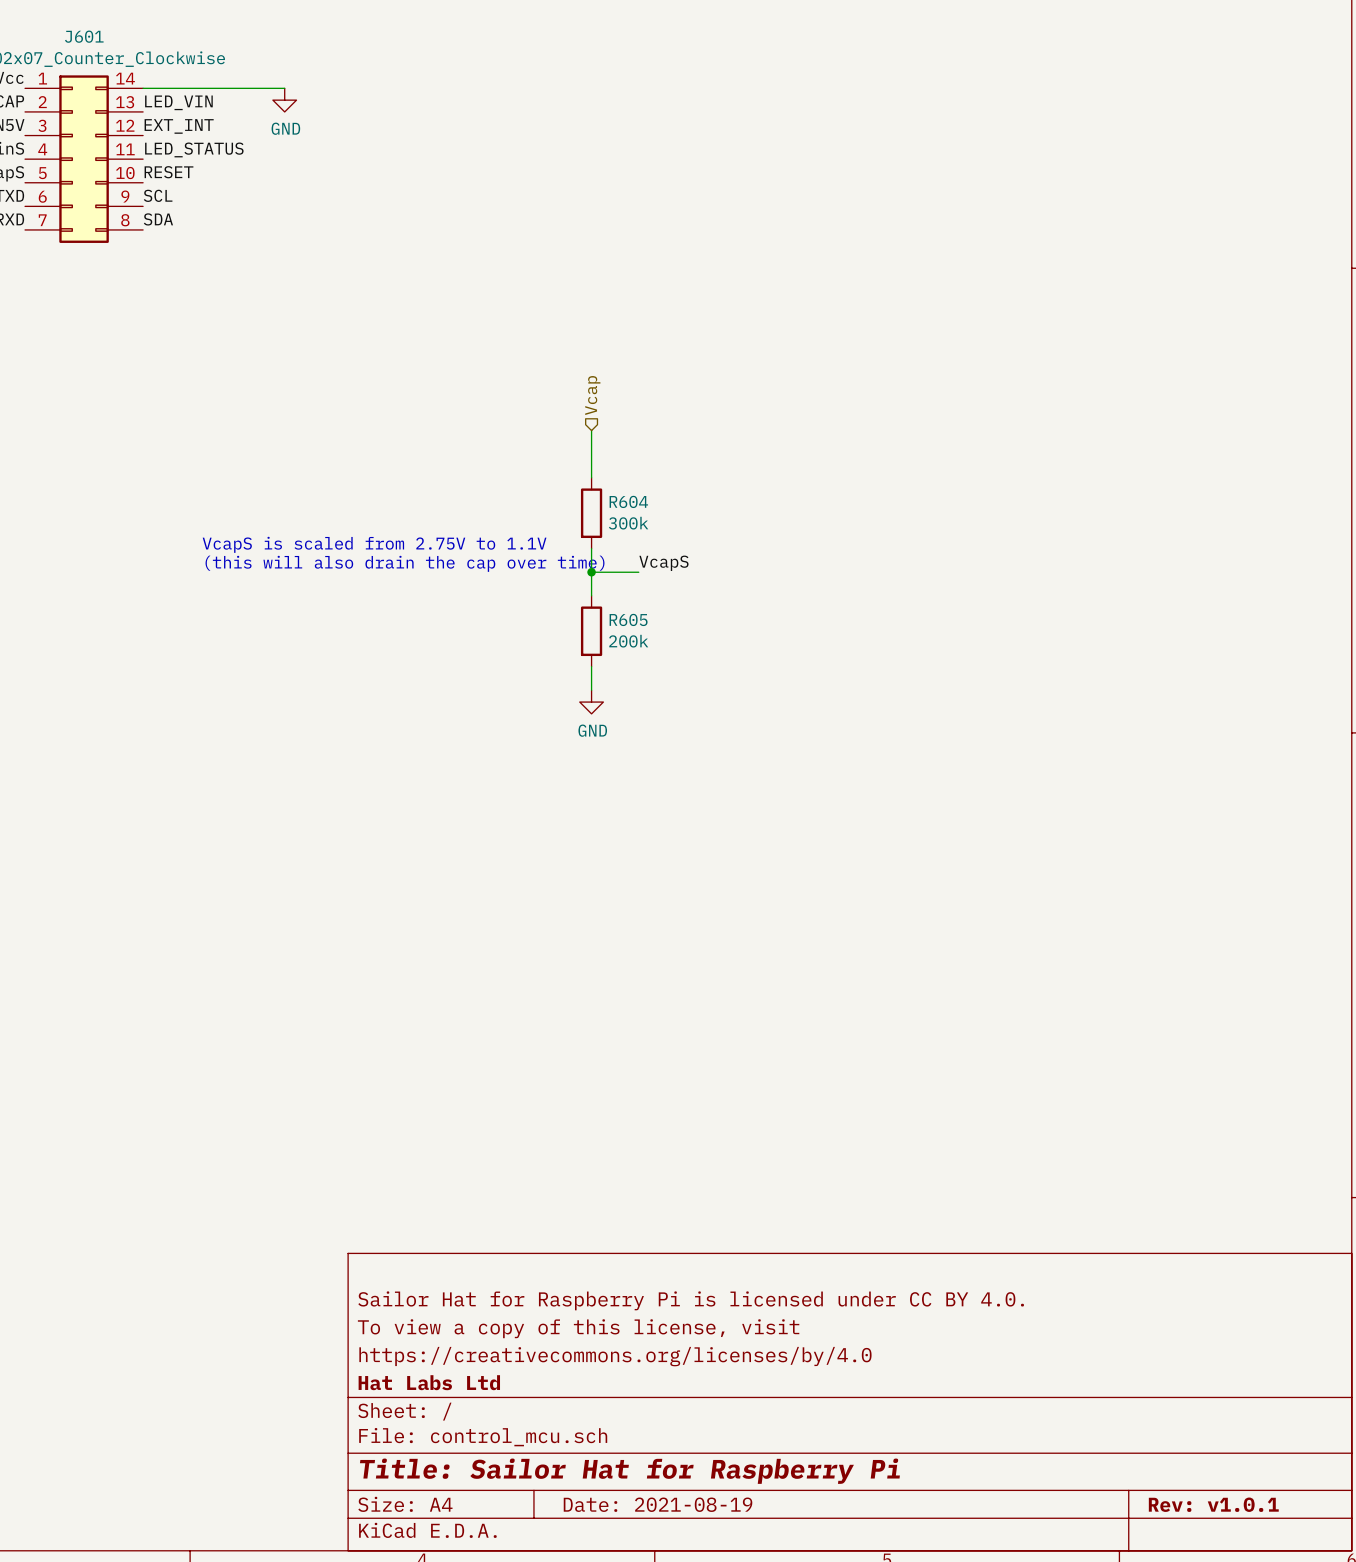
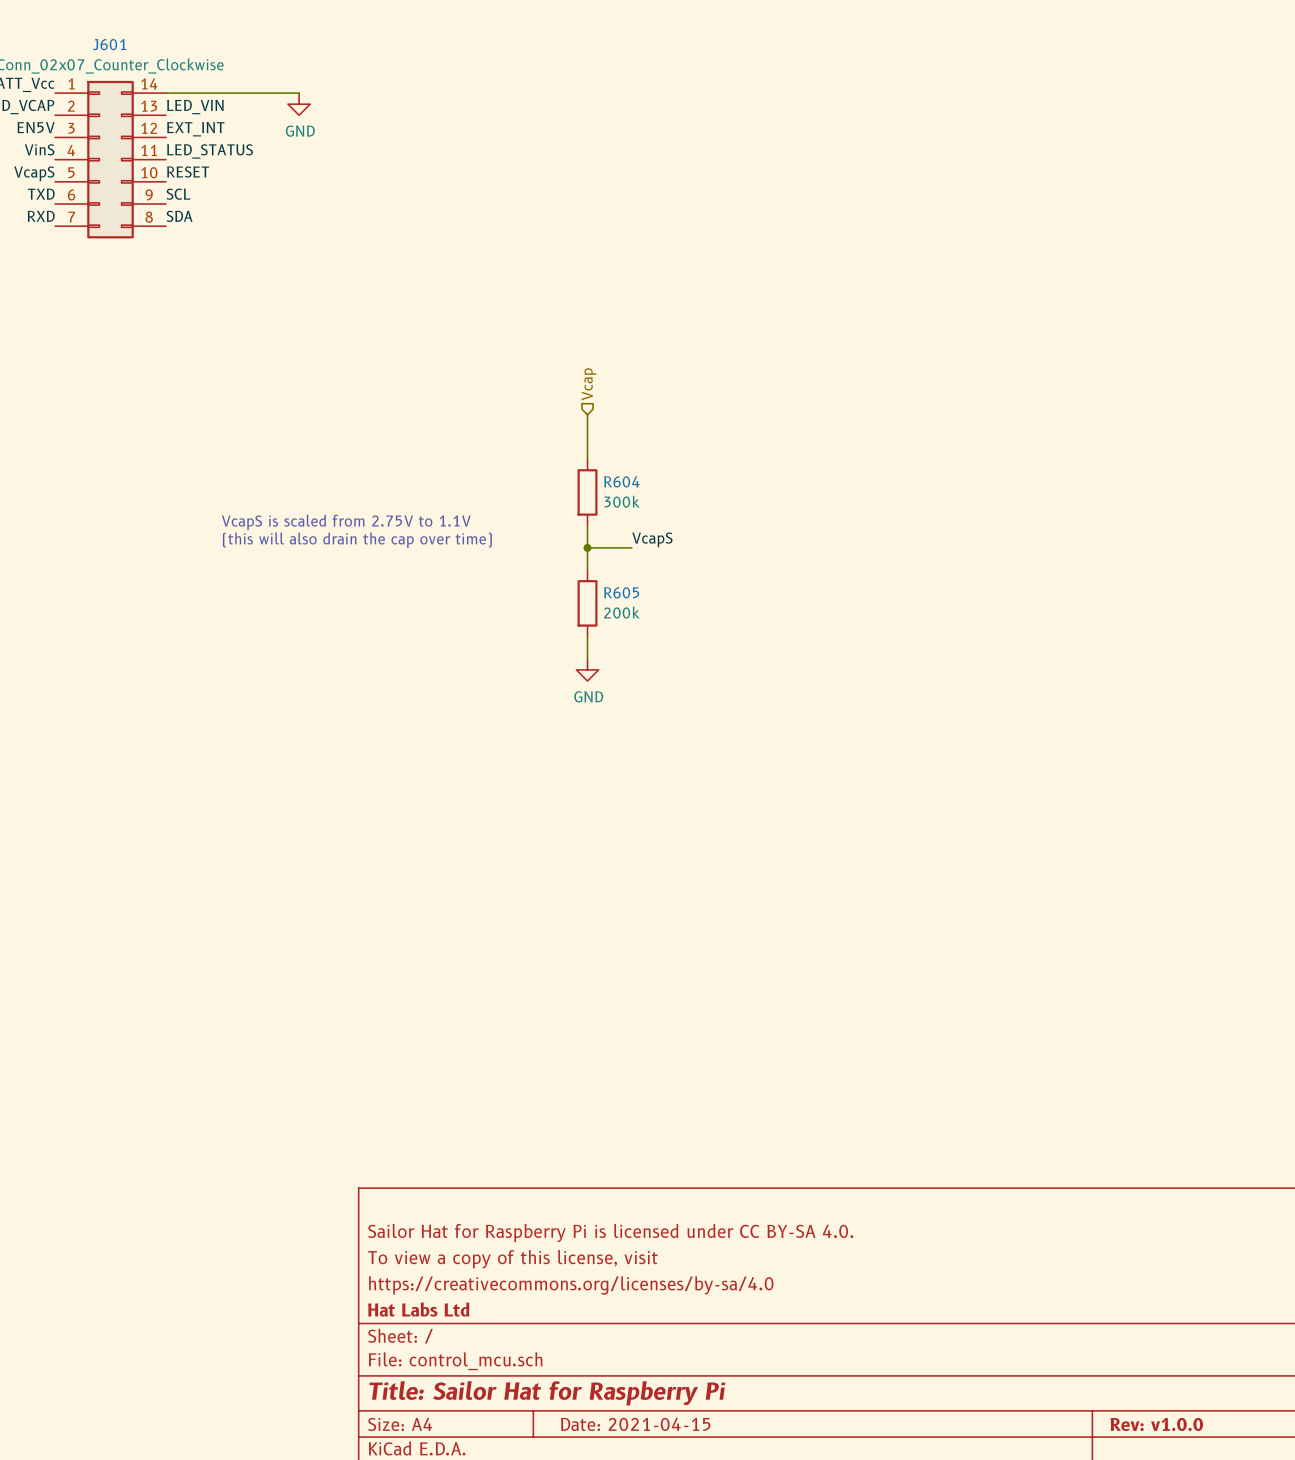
title block: Sailor Hat for Raspberry Pi is licensed under CC BY 4.0. (691, 1300) -> Sailor Hat for Raspberry Pi is licensed under CC BY-SA 4.0. (610, 1233)
title block: https://creativecommons.org/licenses/by/4.0 (615, 1356) -> https://creativecommons.org/licenses/by-sa/4.0 (571, 1285)
title block: Date: 2021-08-19 (658, 1504) -> Date: 2021-04-15 (635, 1424)
title block: Rev: v1.0.1 (1213, 1504) -> Rev: v1.0.0 (1156, 1424)

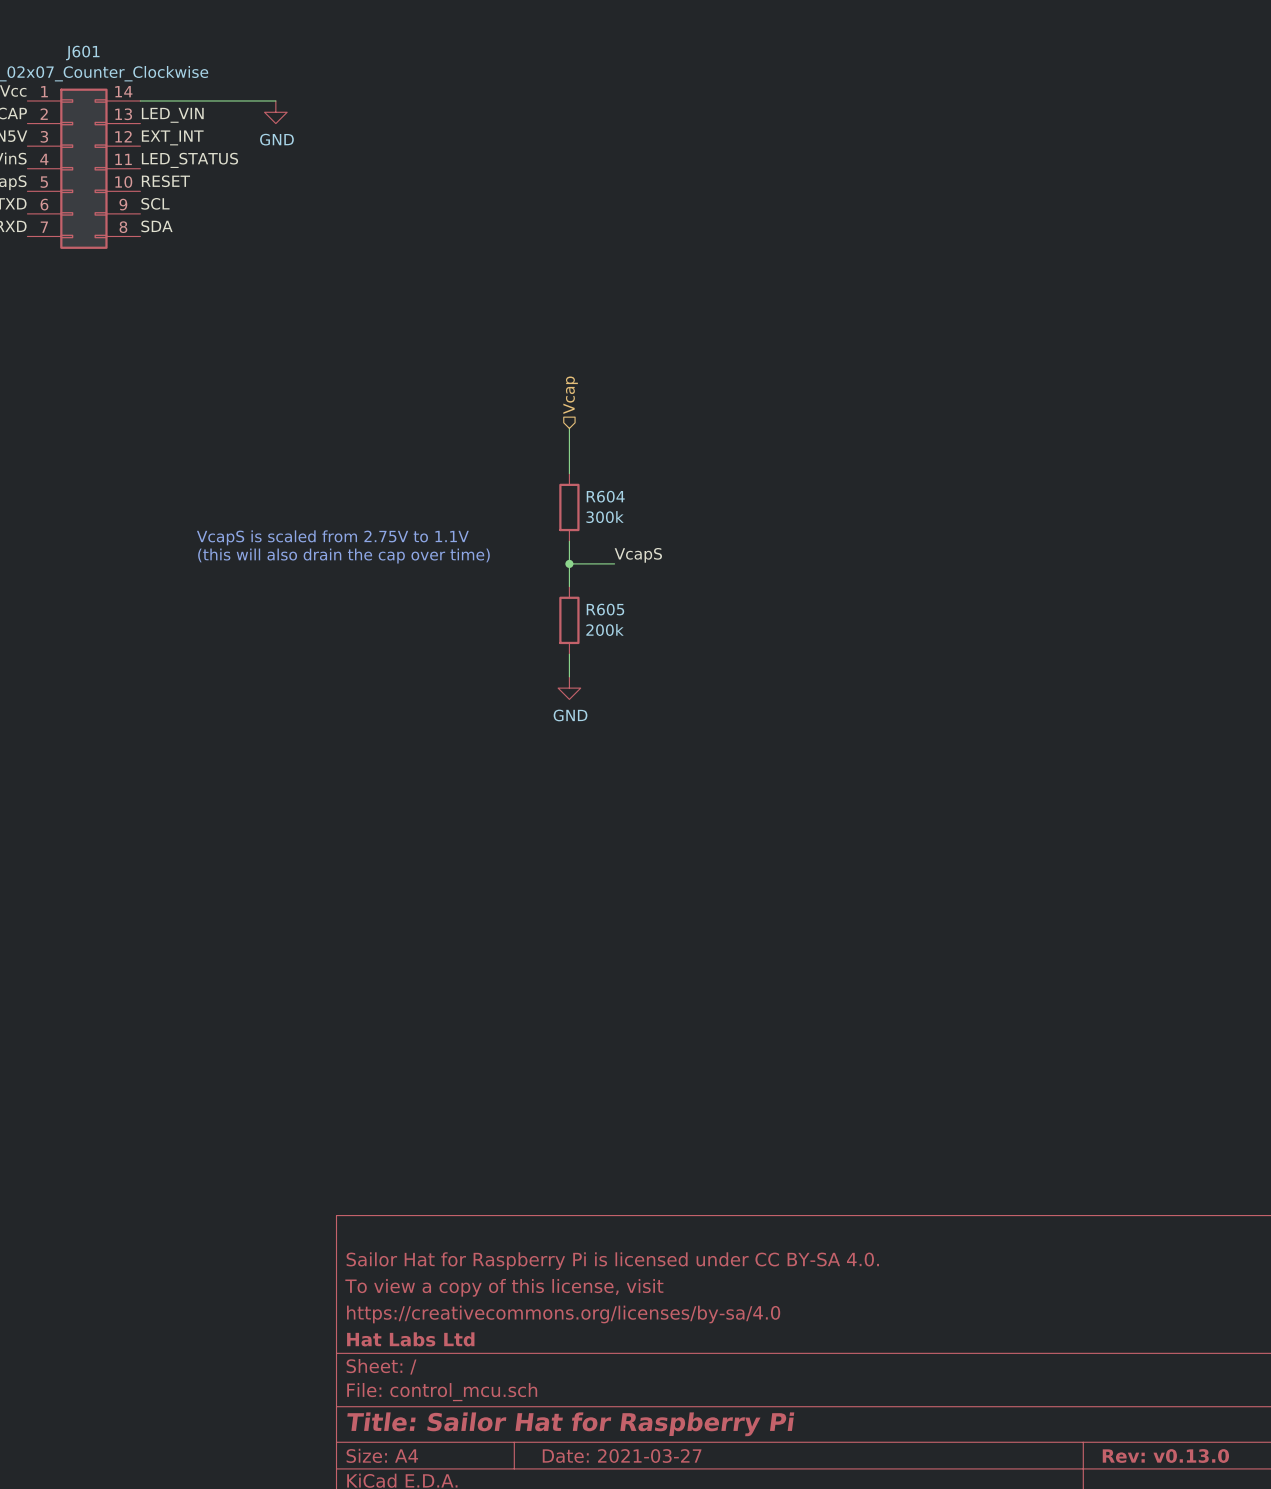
title block: Date: 2021-04-15 (635, 1424) -> Date: 2021-03-27 (622, 1456)
title block: Rev: v1.0.0 (1156, 1424) -> Rev: v0.13.0 (1165, 1456)

